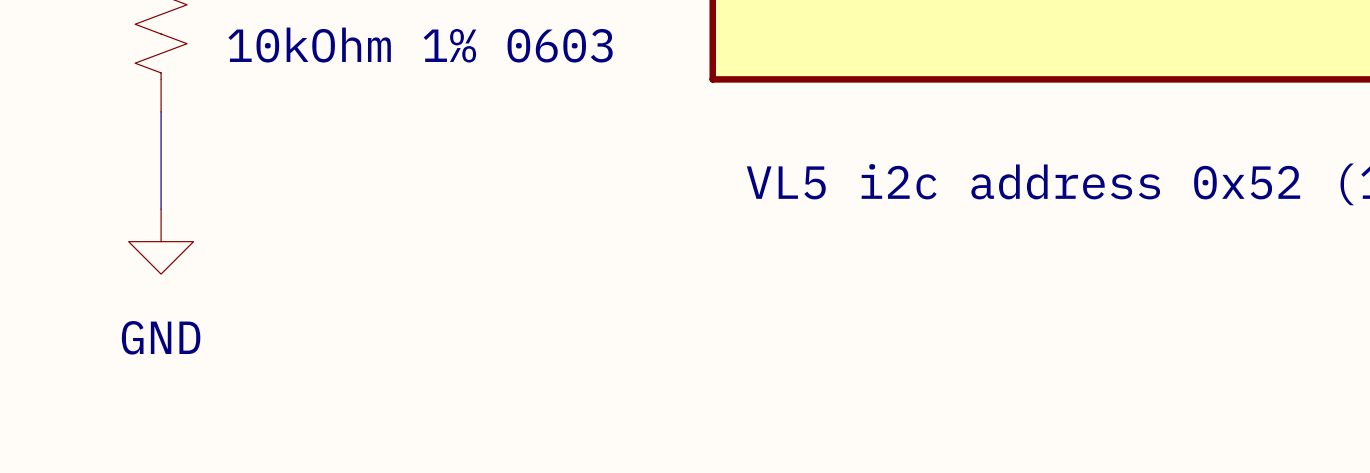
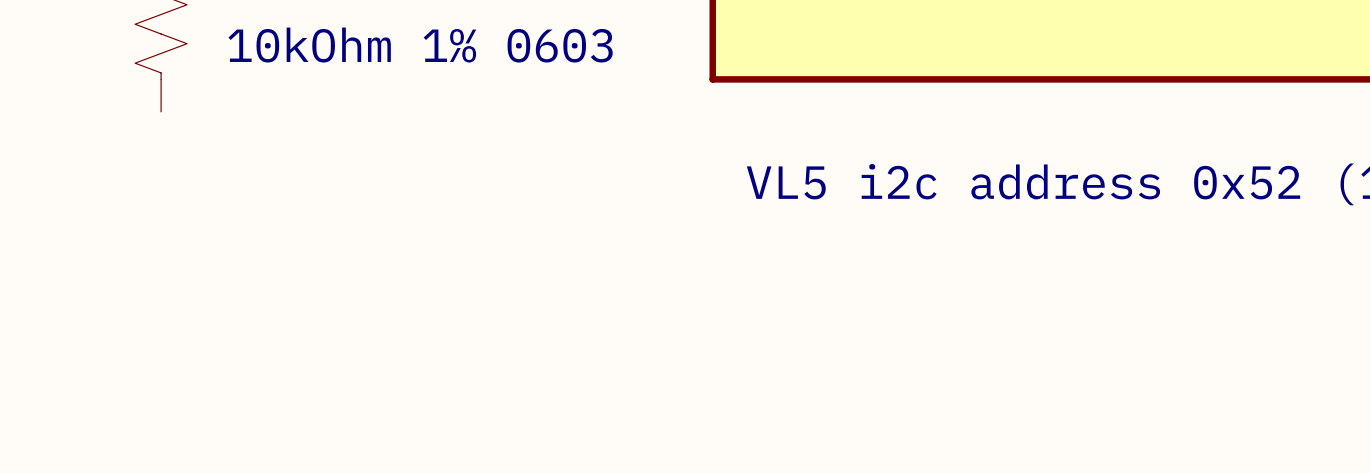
wire: (161, 111) (161, 209) -> none
power symbol: GND (161, 241) -> none

